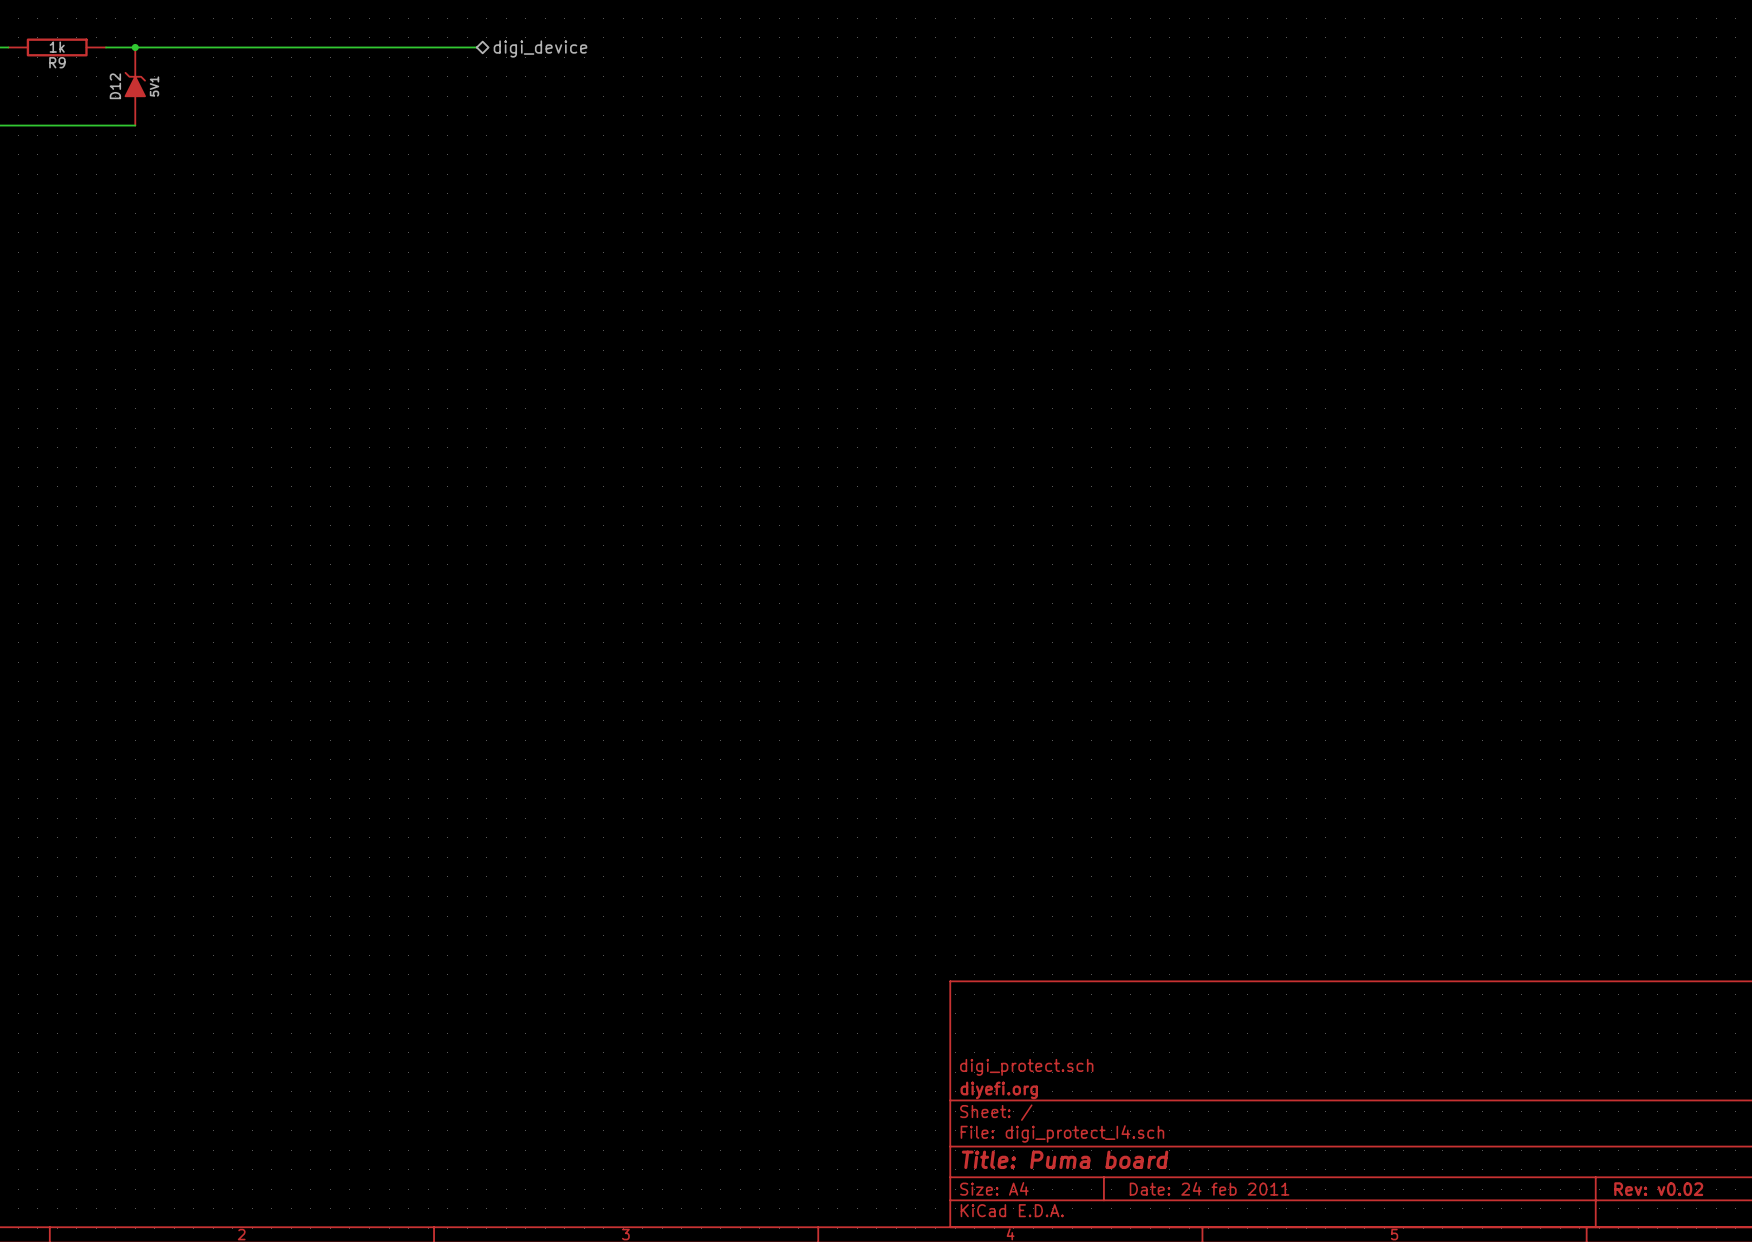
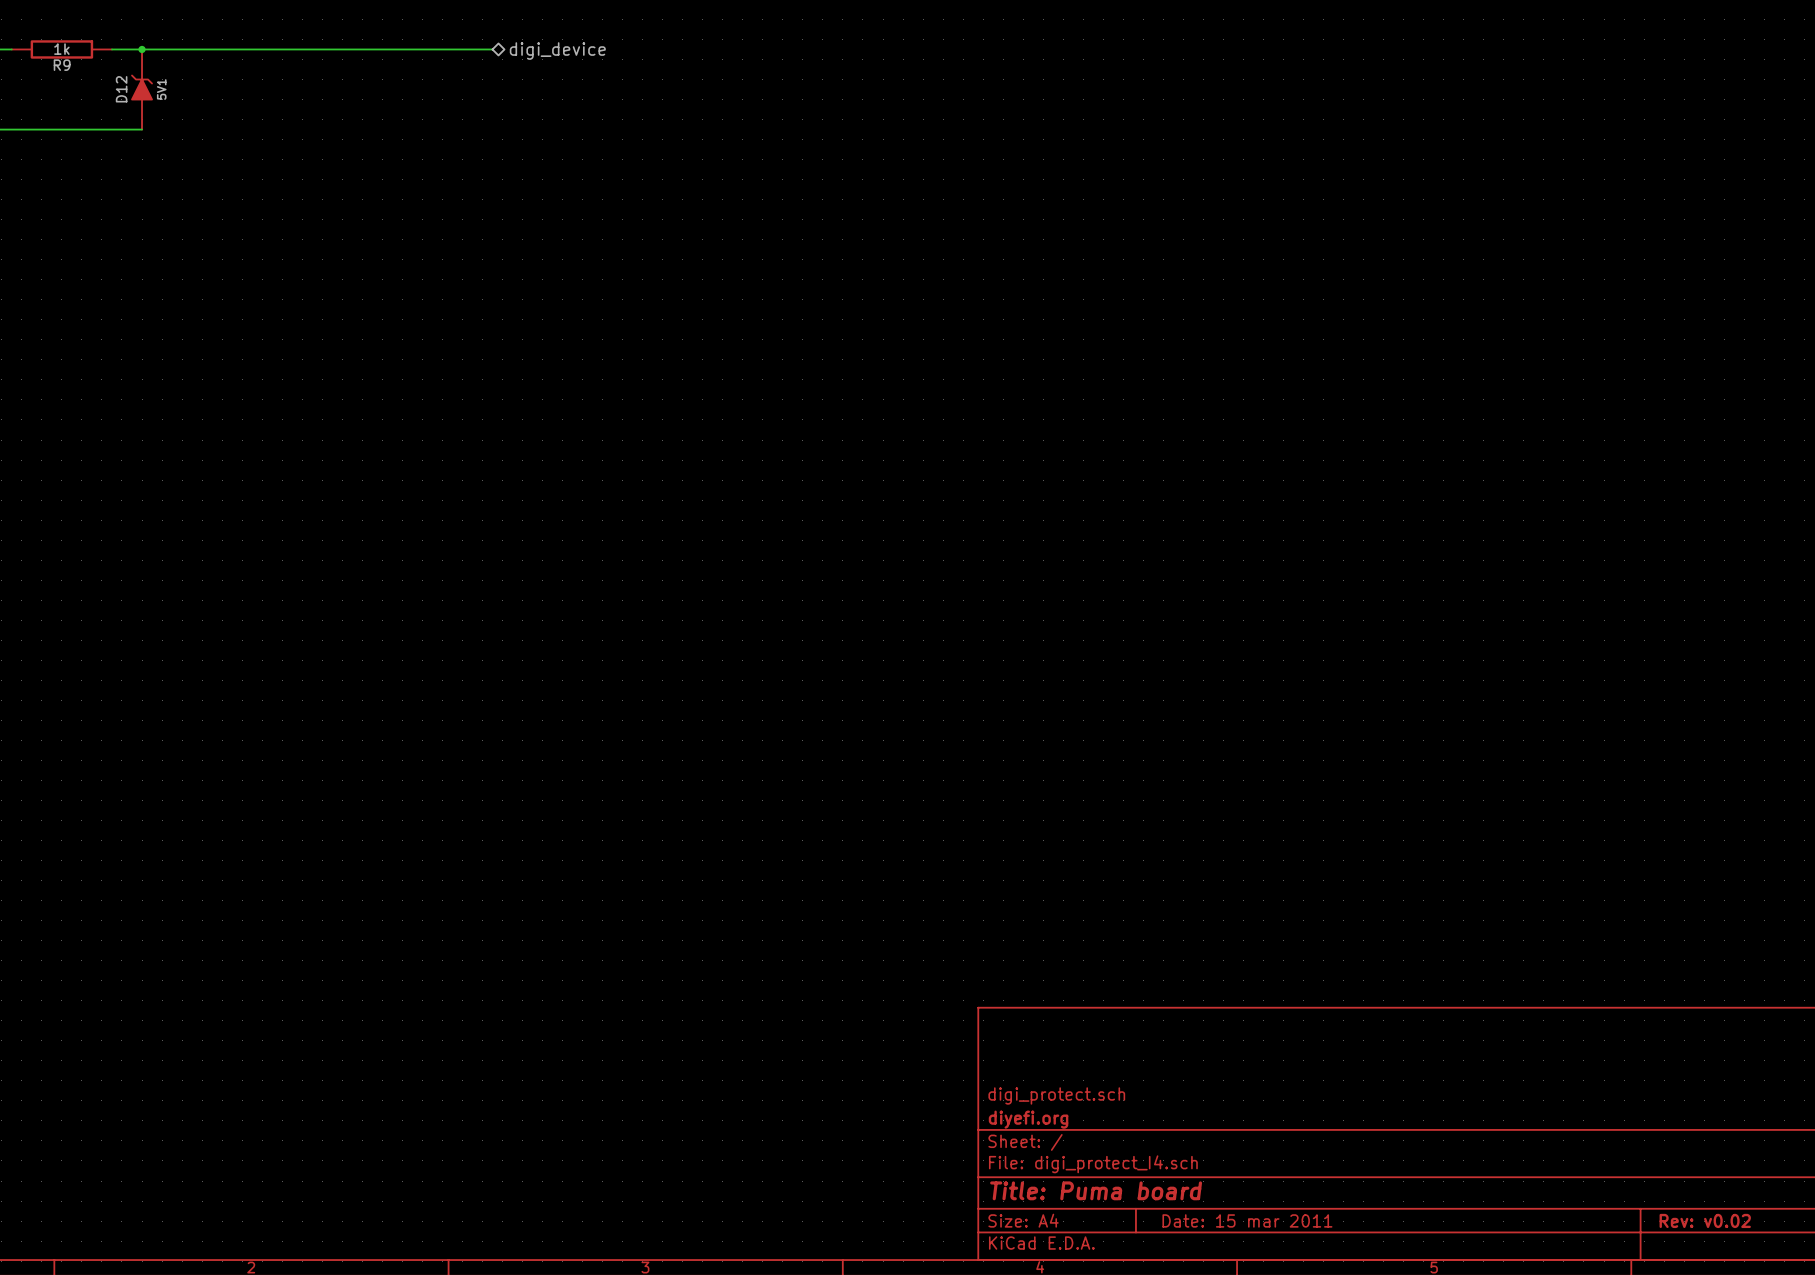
title block: Date: 24 feb 2011 (1209, 1188) -> Date: 15 mar 2011 (1247, 1220)

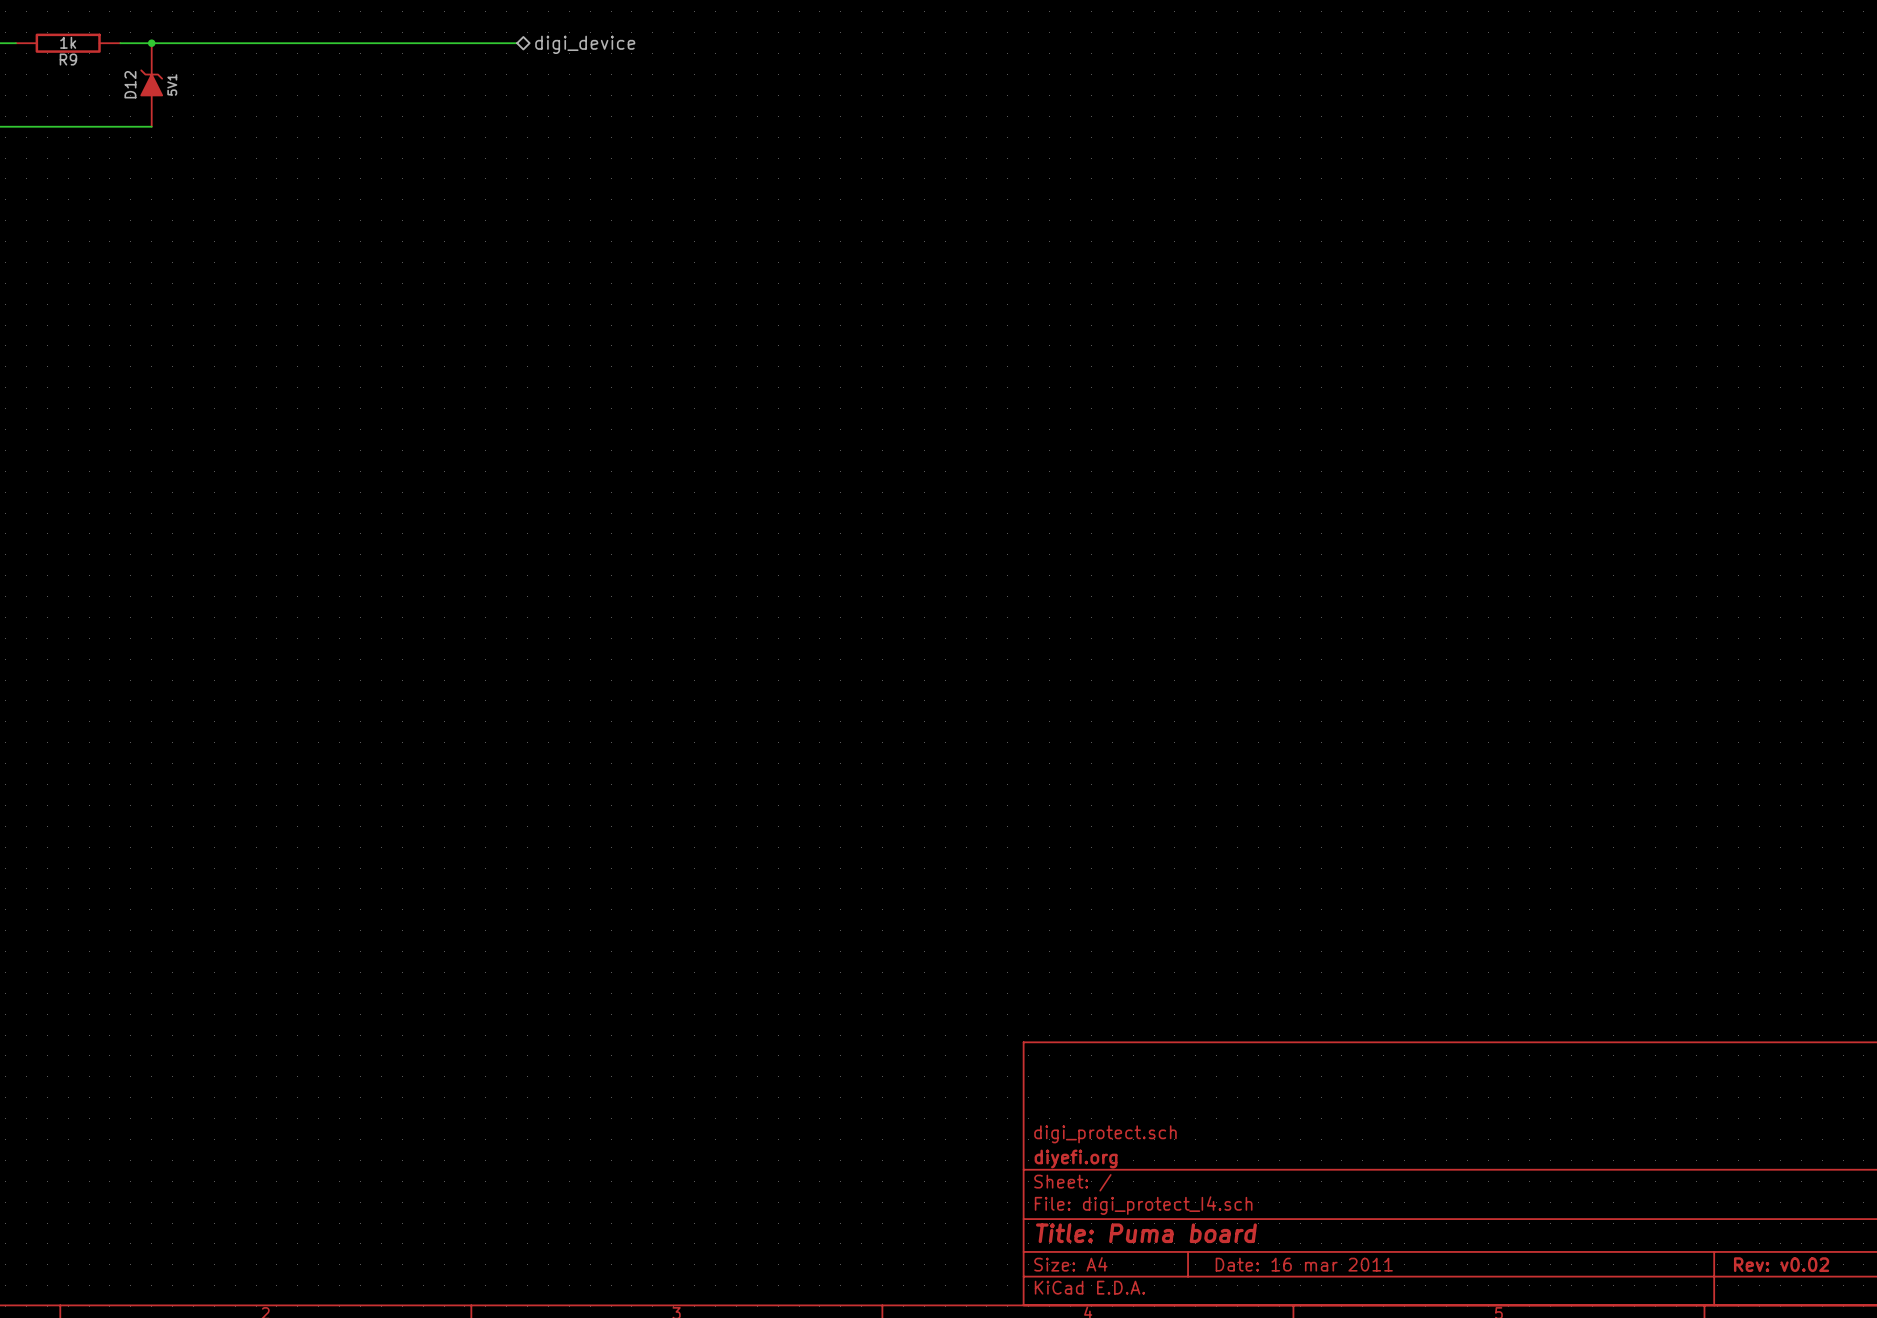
title block: Date: 15 mar 2011 (1247, 1220) -> Date: 16 mar 2011 (1304, 1264)

